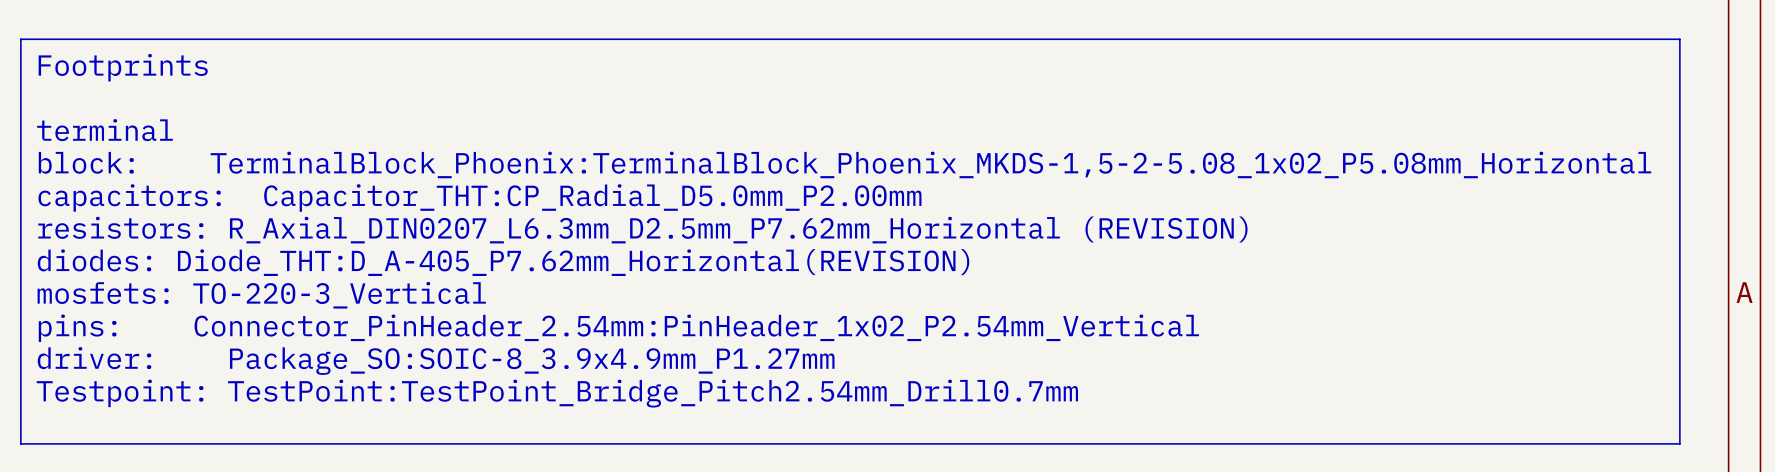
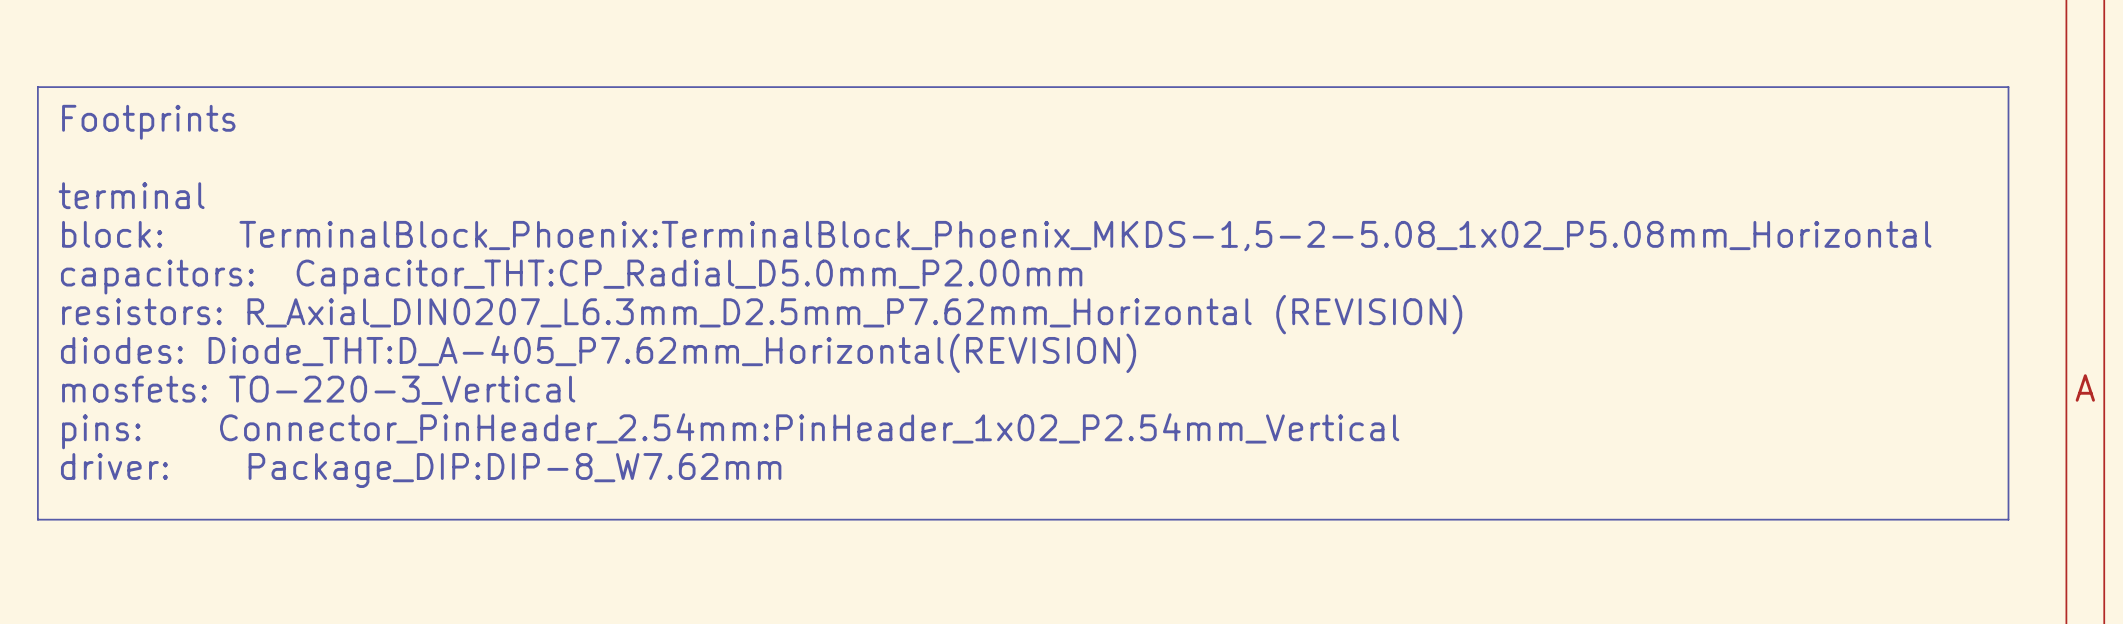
text: driver: Package_SO:SOIC-8_3.9x4.9mm_P1.27mm (436, 361) -> driver: Package_DIP:DIP-8_W7.62mm (421, 470)
text: Testpoint: TestPoint:TestPoint_Bridge_Pitch2.54mm_Drill0.7mm (557, 393) -> none
line: (20, 403) (20, 443) (1679, 443) (1679, 403) -> (37, 519) (2008, 519)

